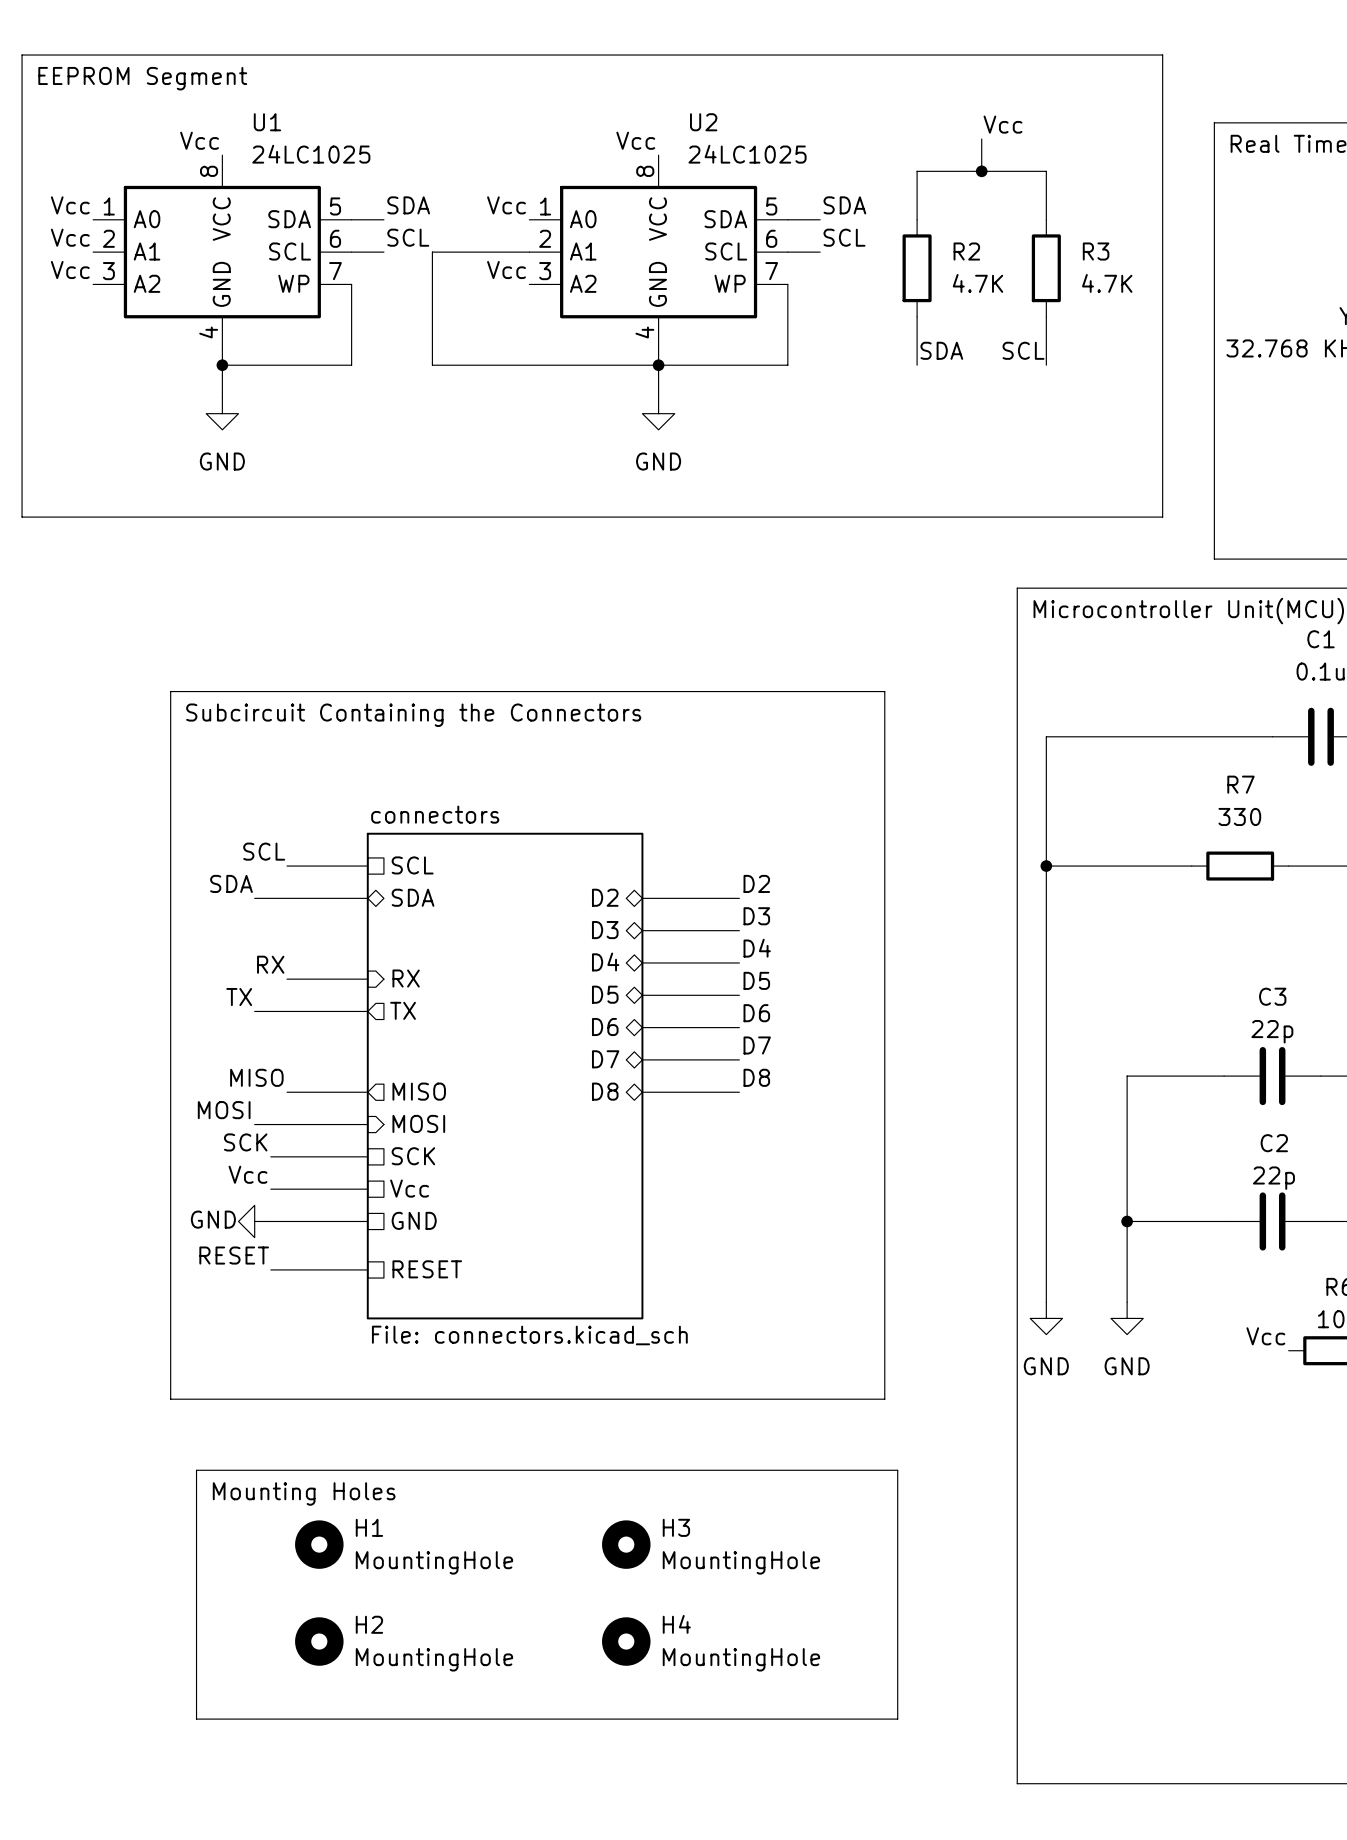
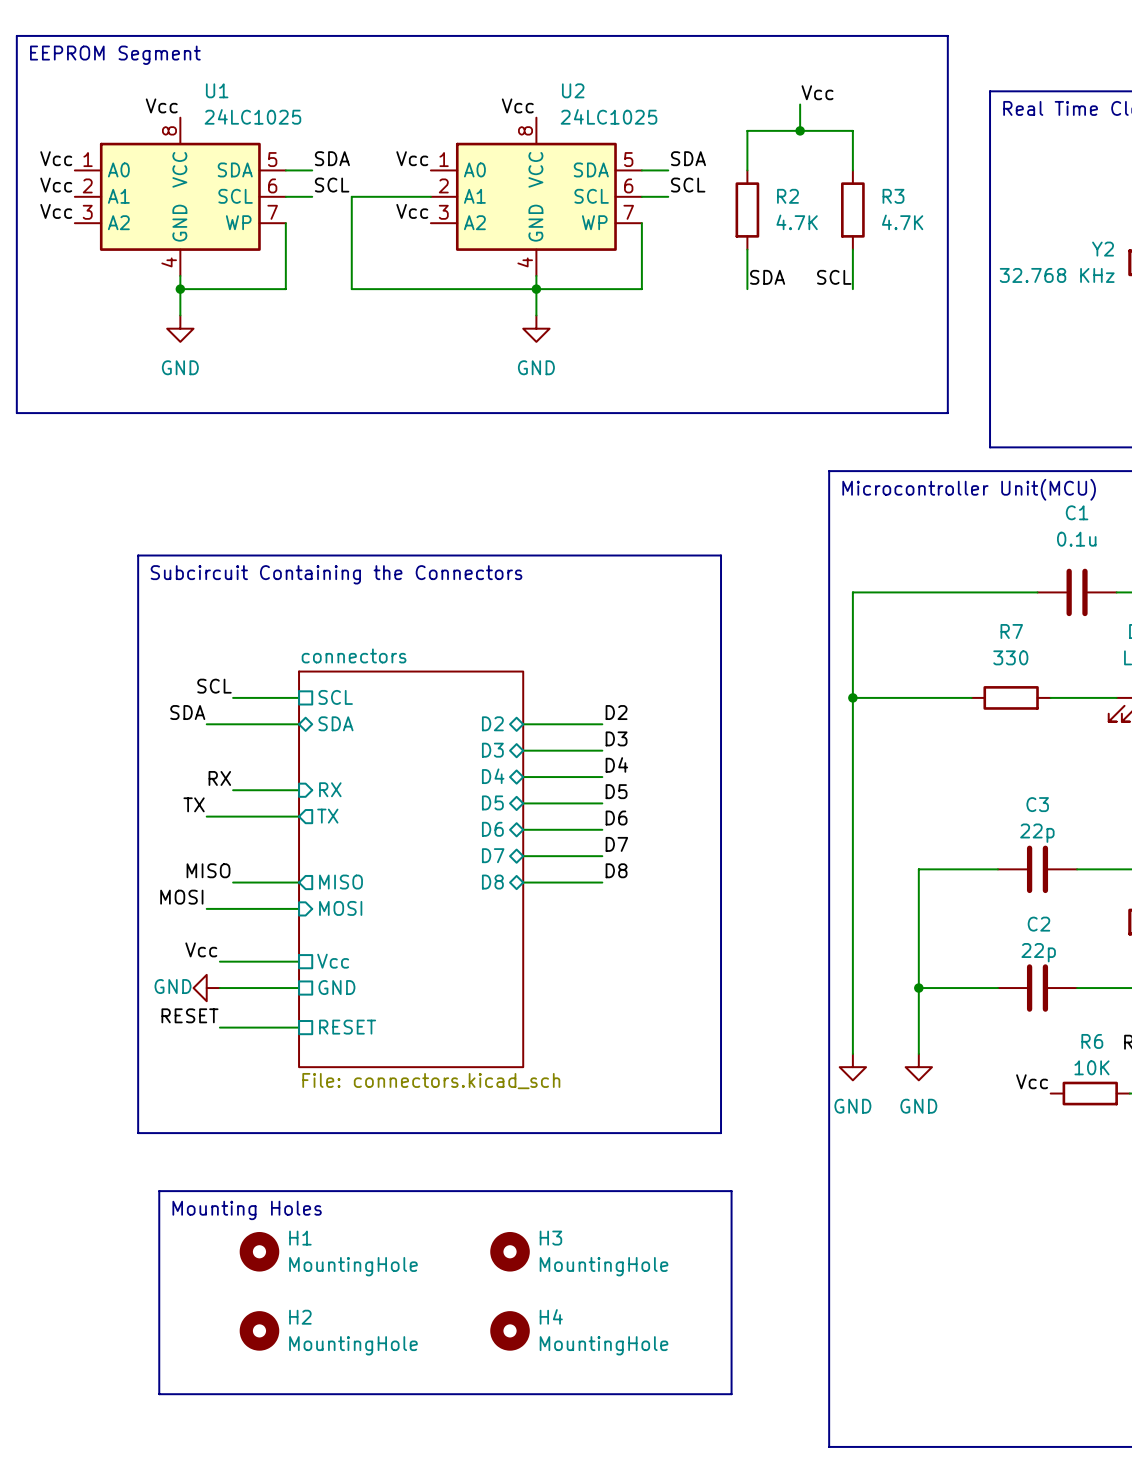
label: SCK (245, 1142) -> none
wire: (270, 1156) (367, 1156) -> none
sheet pin: SCK (413, 1156) -> none

